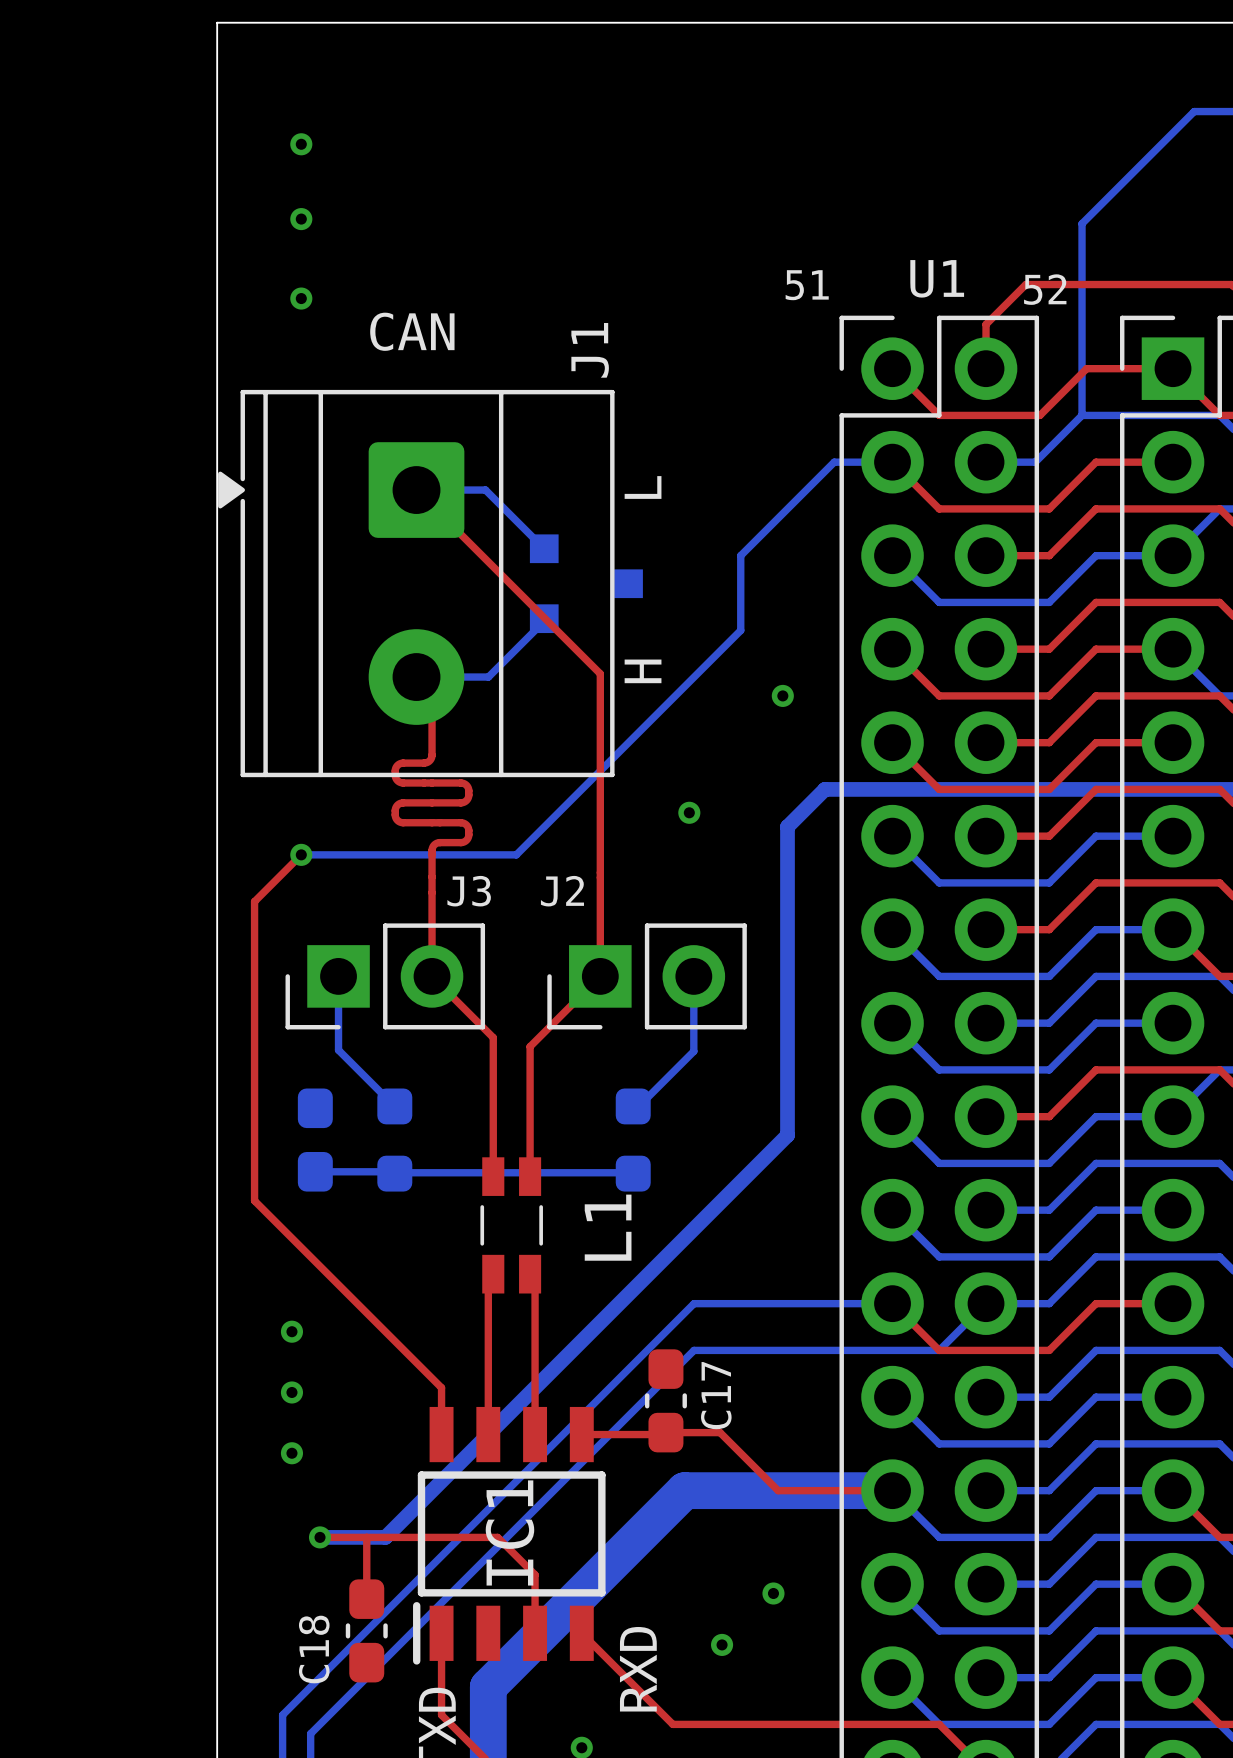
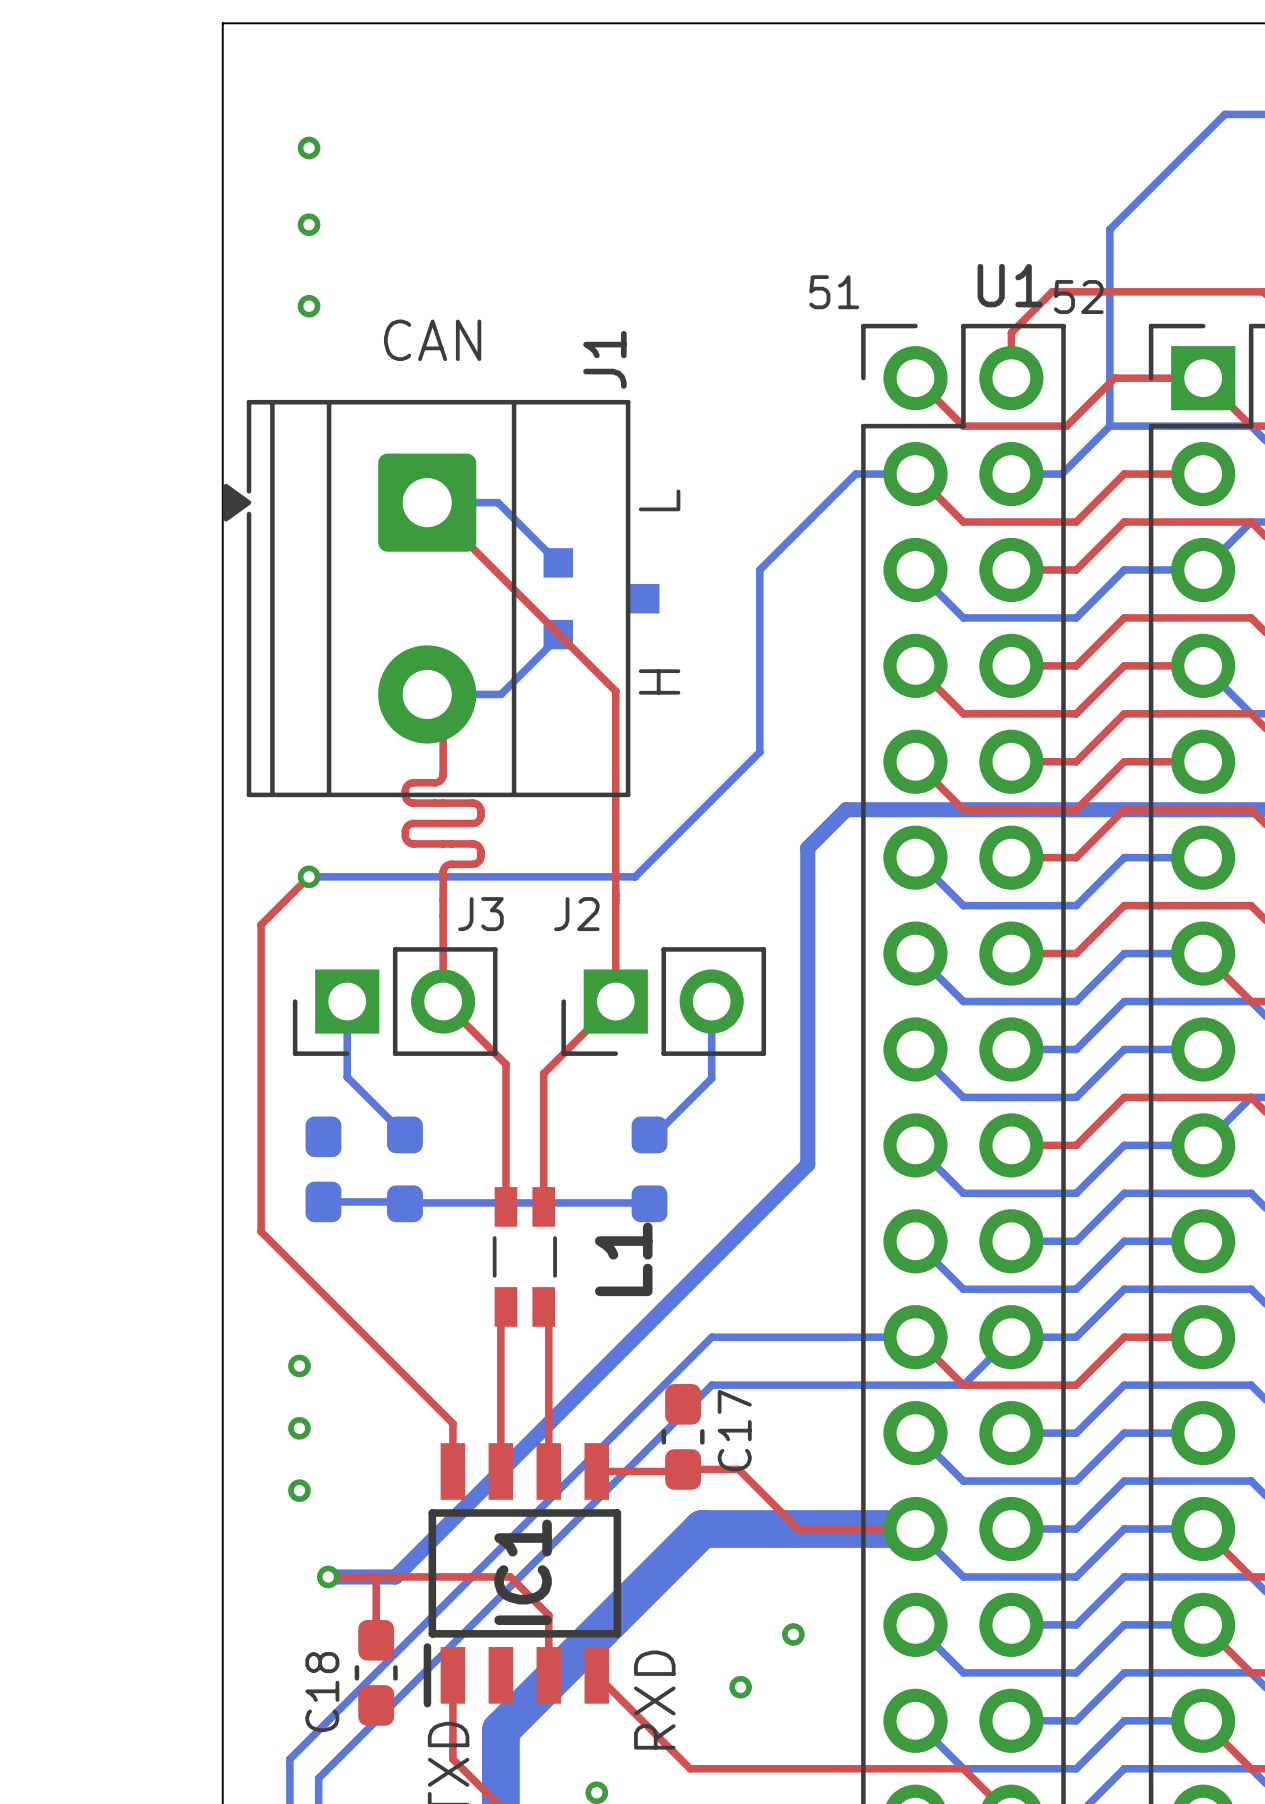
U1 name position: U1 (937, 278) -> U1 (1010, 285)
bottom track: (740, 630) (516, 854) -> (759, 646) (759, 752) (635, 876) (529, 876)
via: (782, 695) -> none
via: (689, 812) -> none

